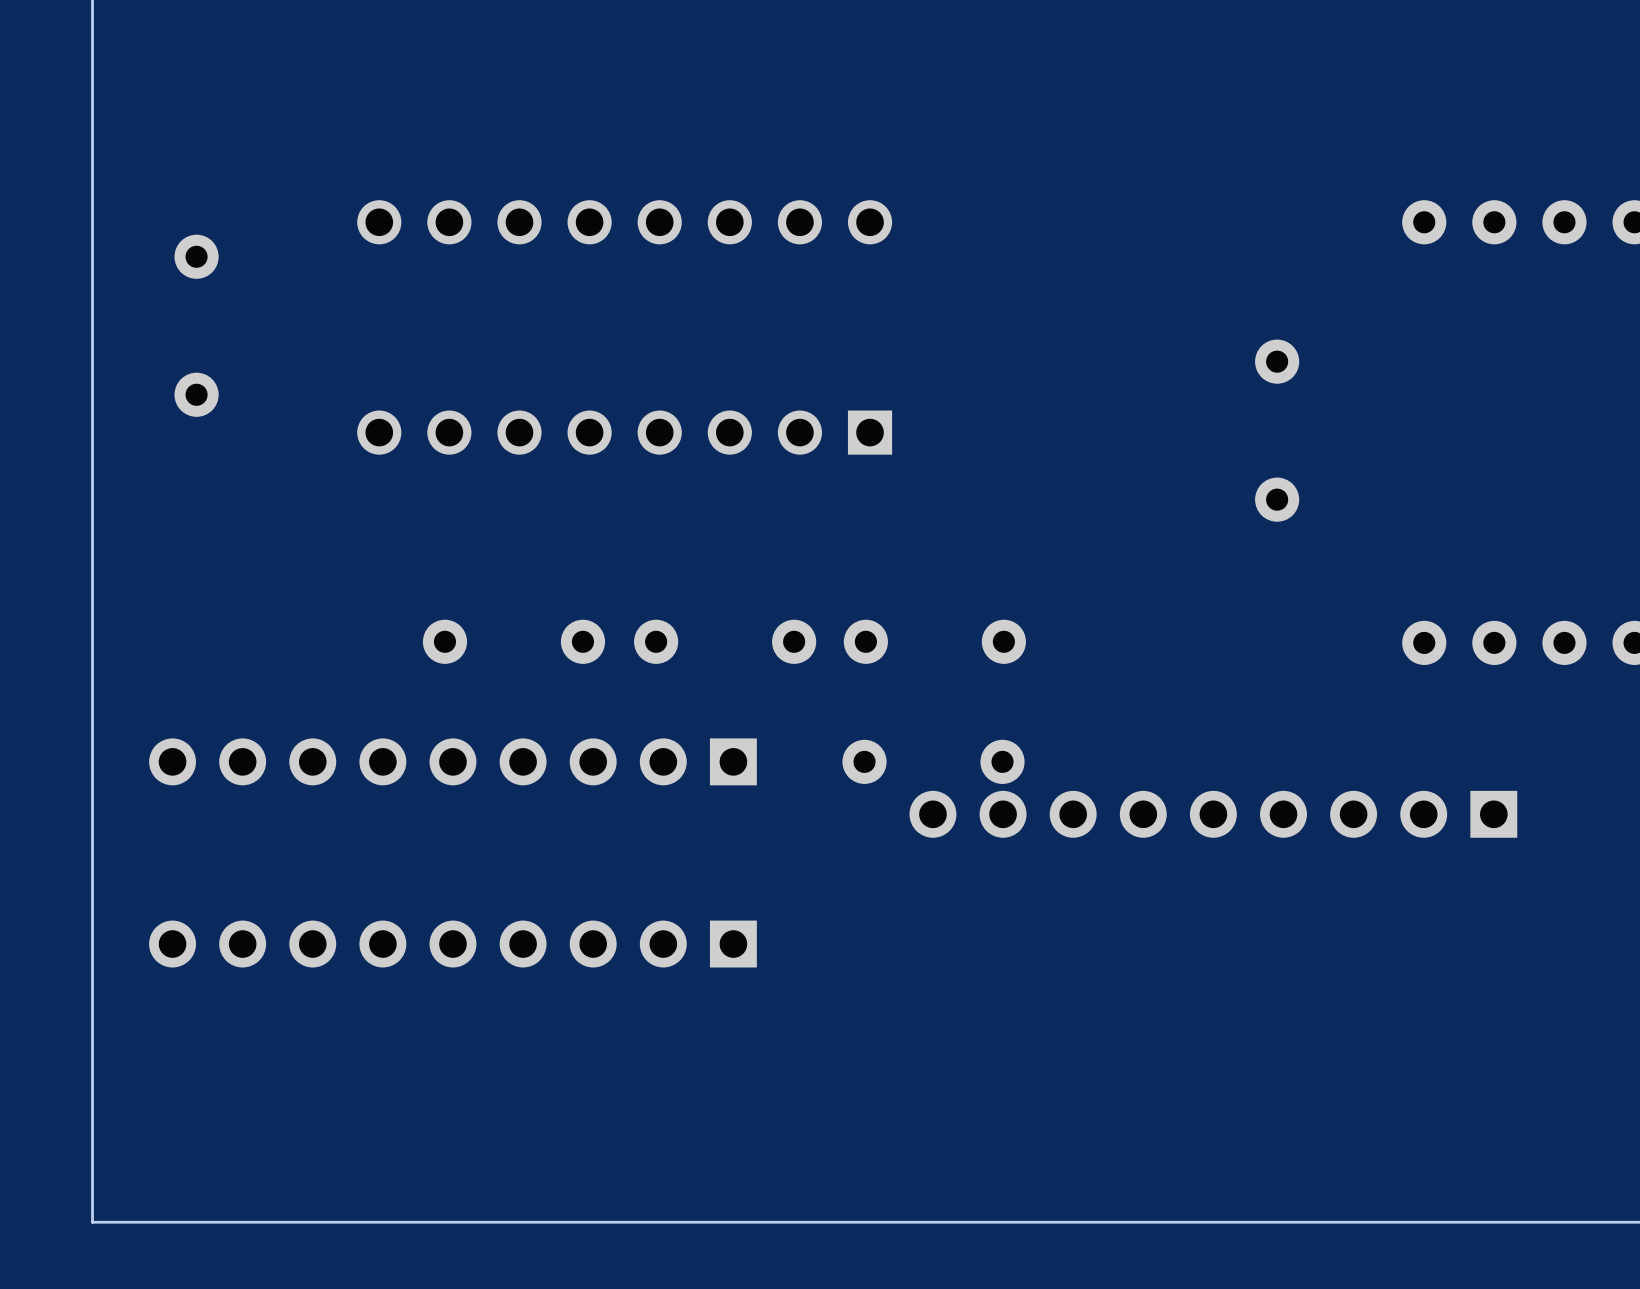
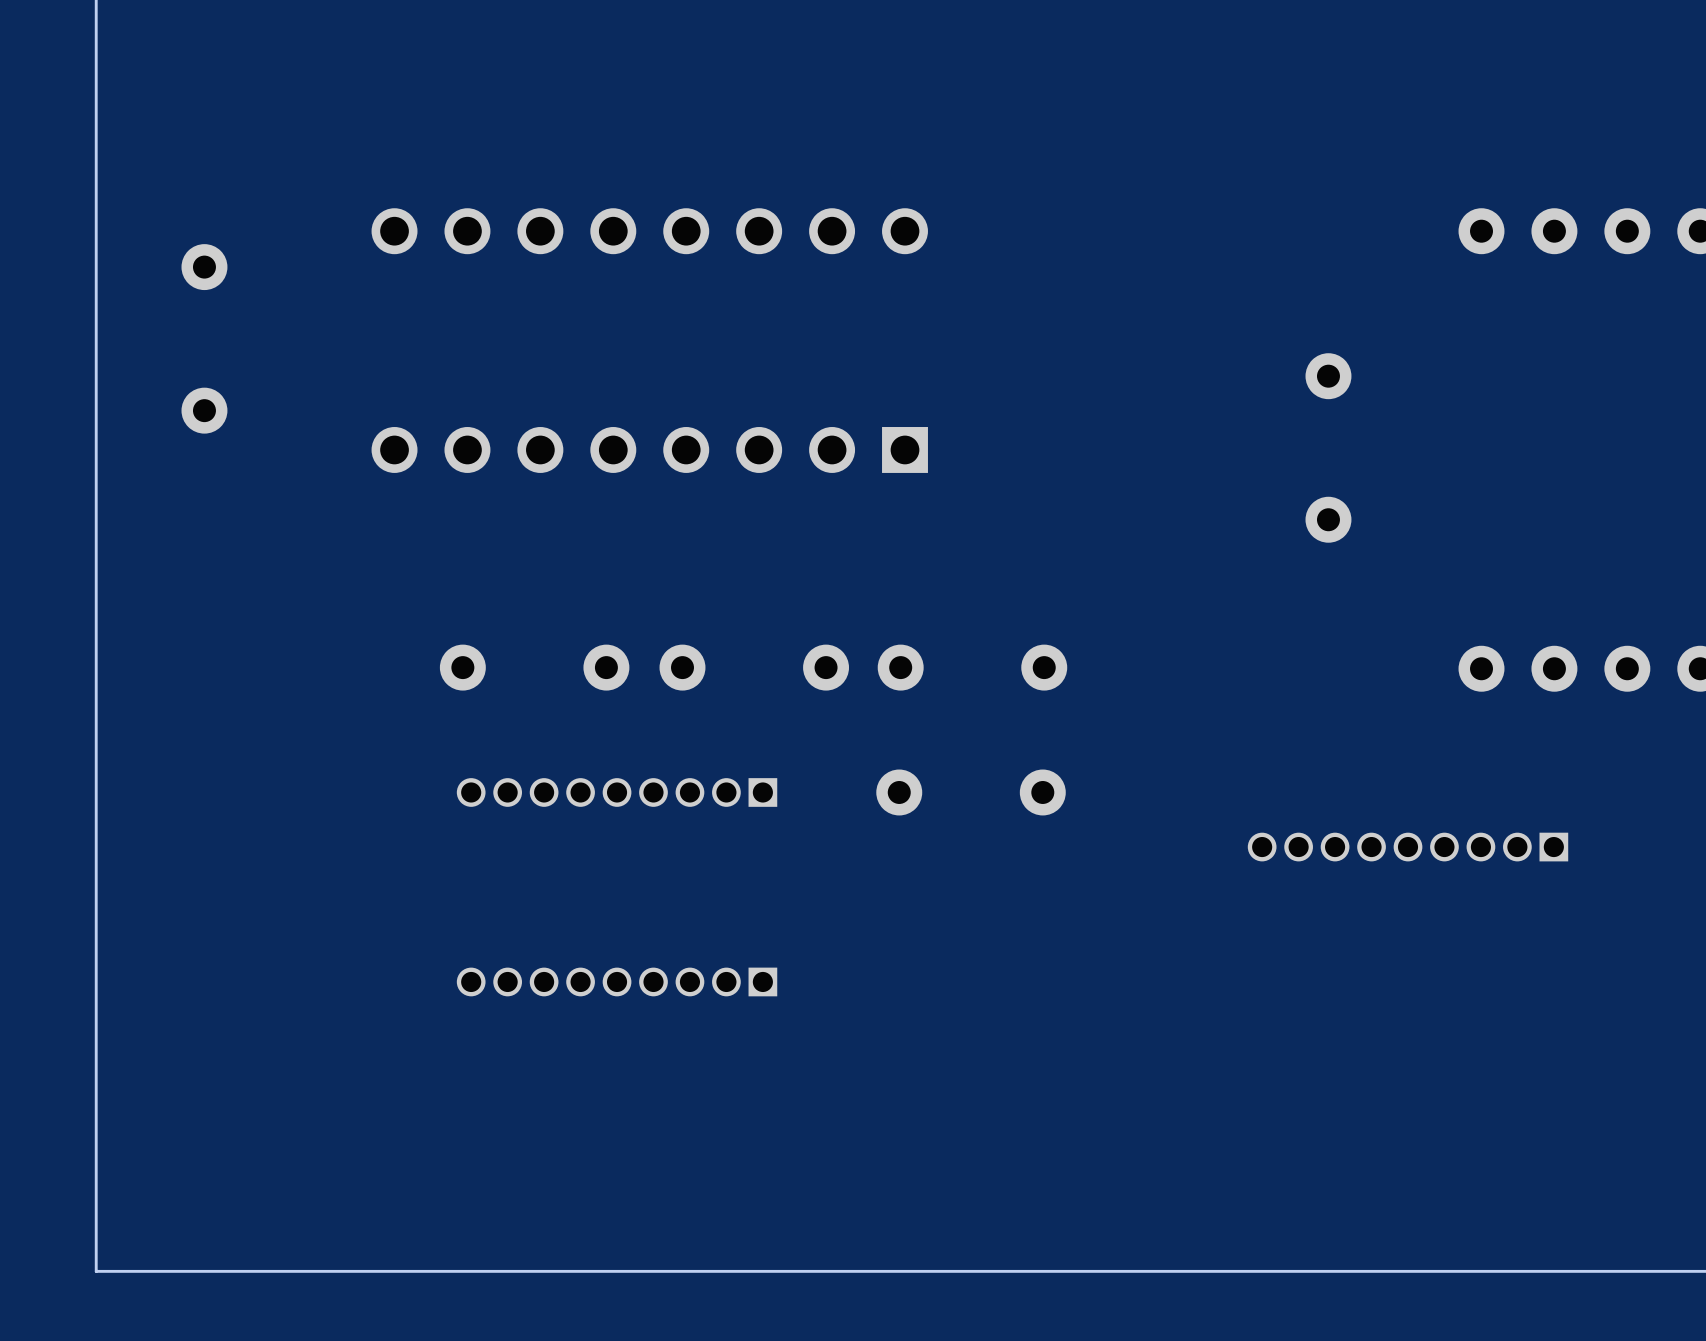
part: (452, 761) -> none
part: none -> (617, 792)
part: (1213, 814) -> none
part: none -> (1408, 847)
part: (452, 944) -> none
part: none -> (617, 981)

